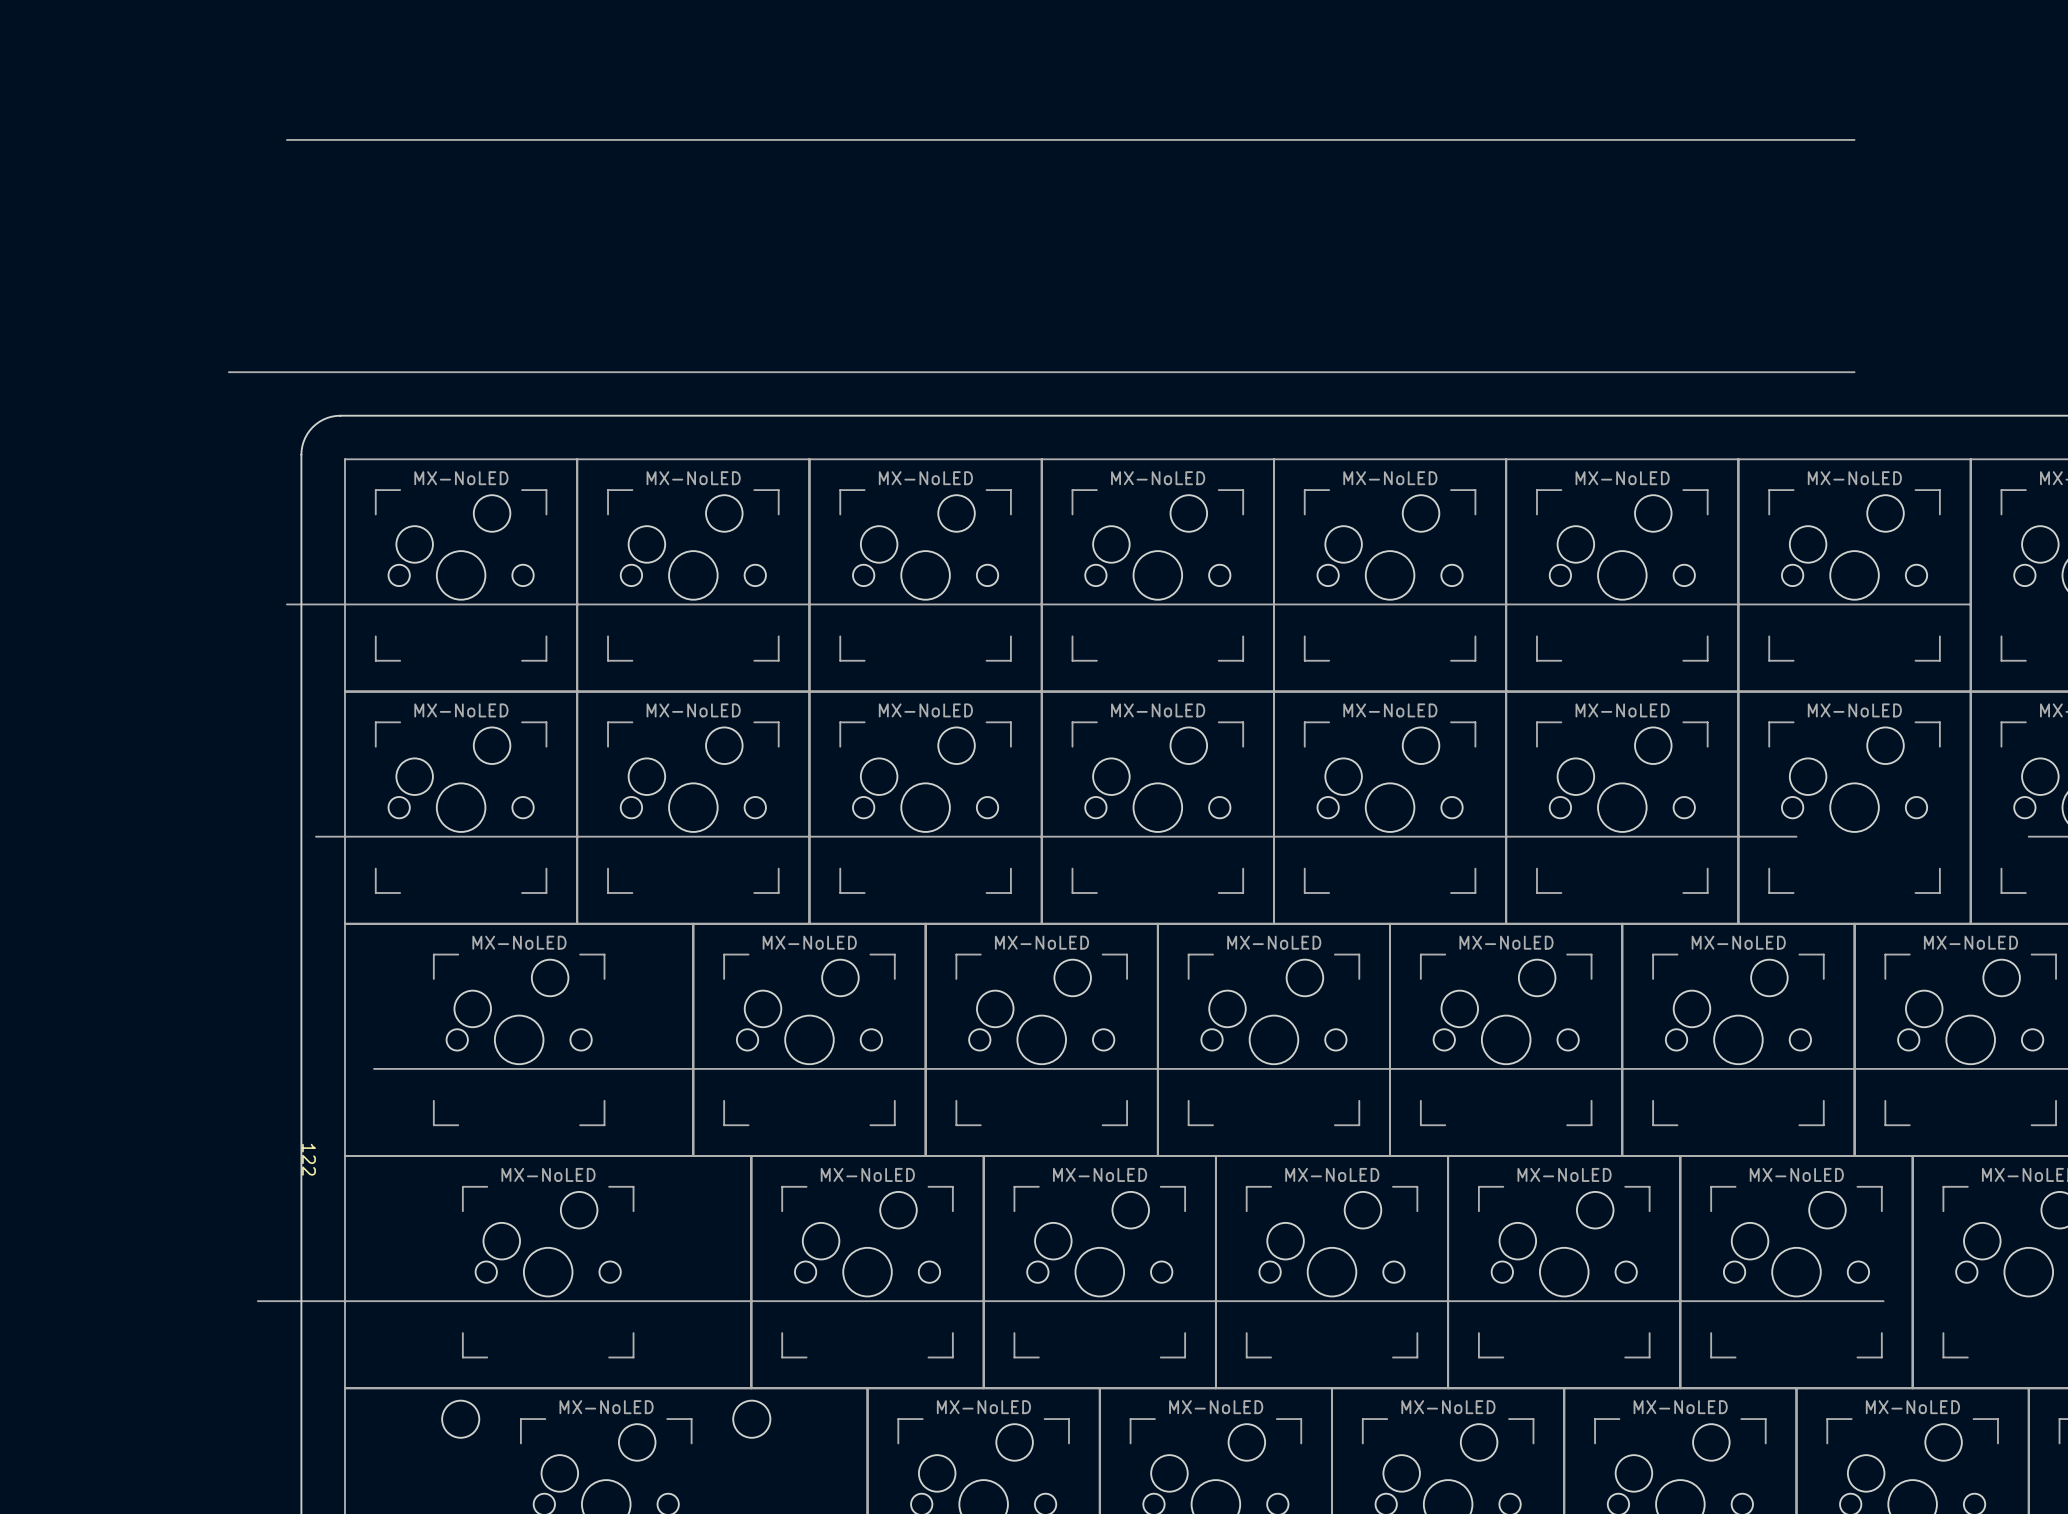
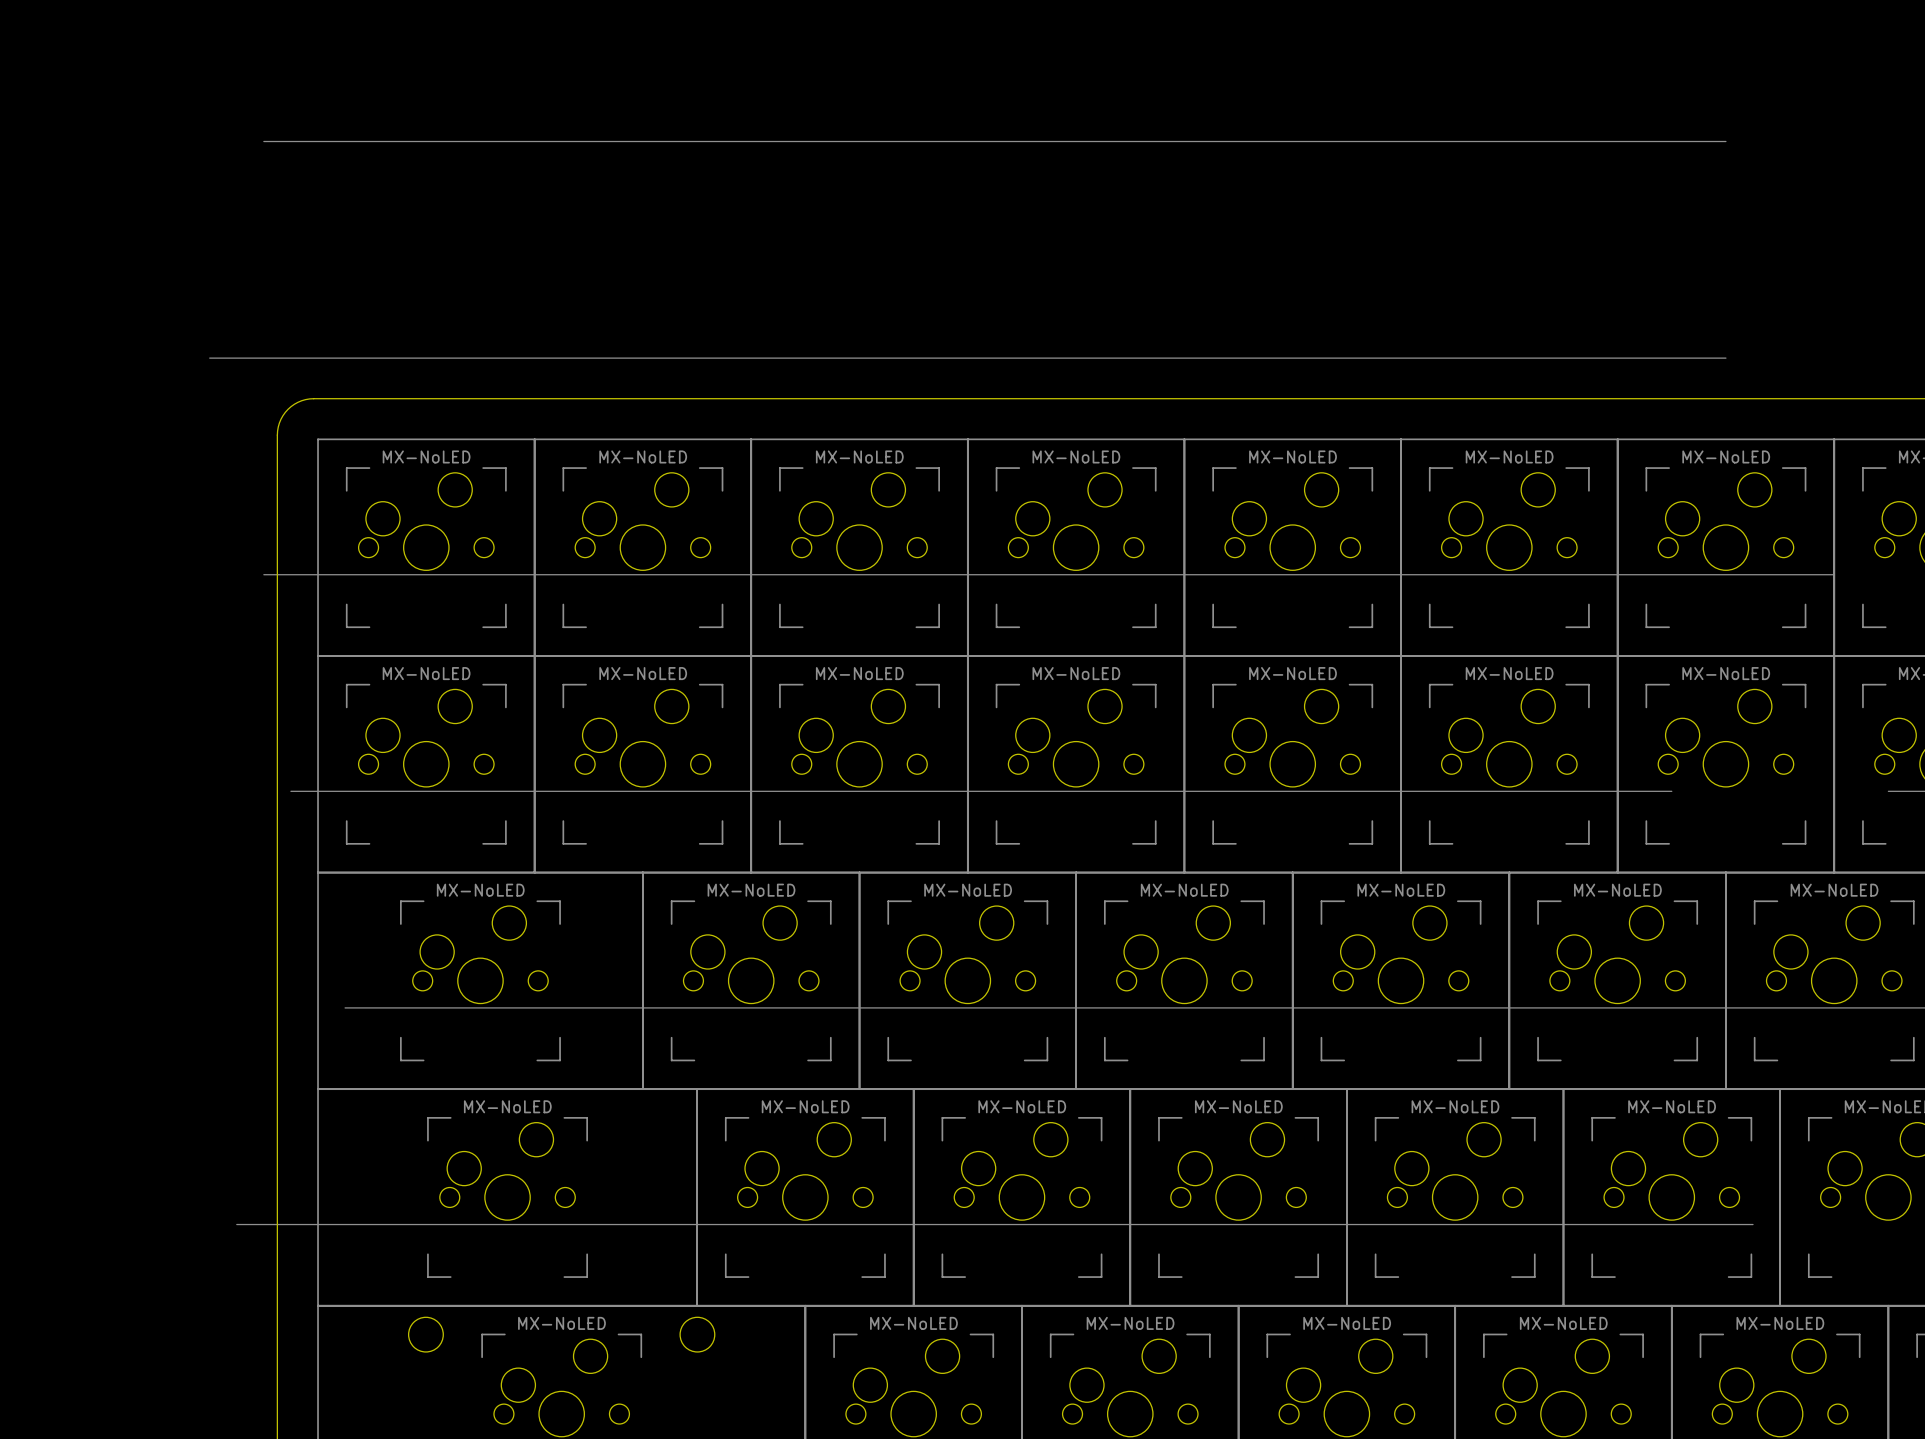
text: 122 (309, 1159) -> none

